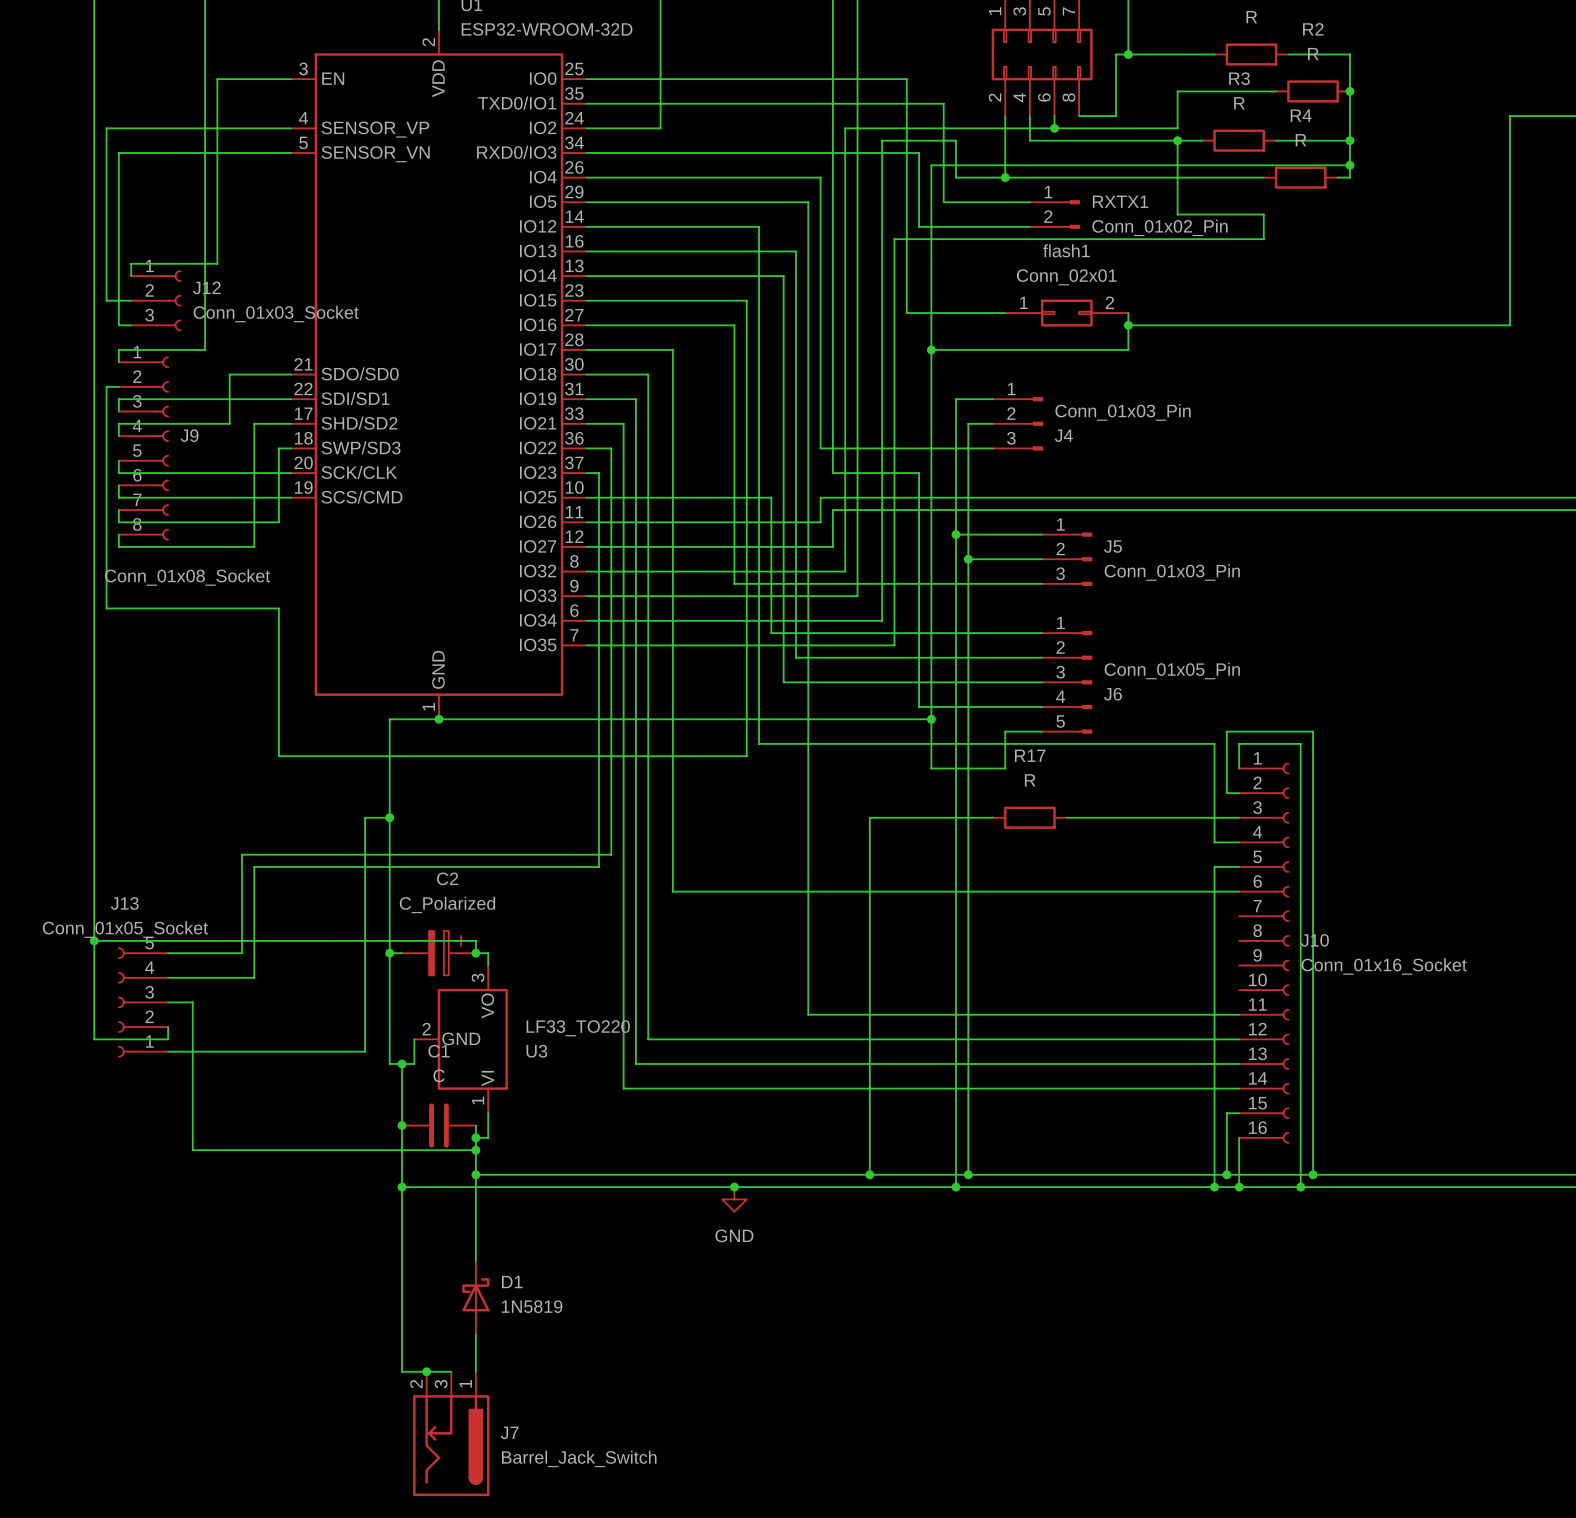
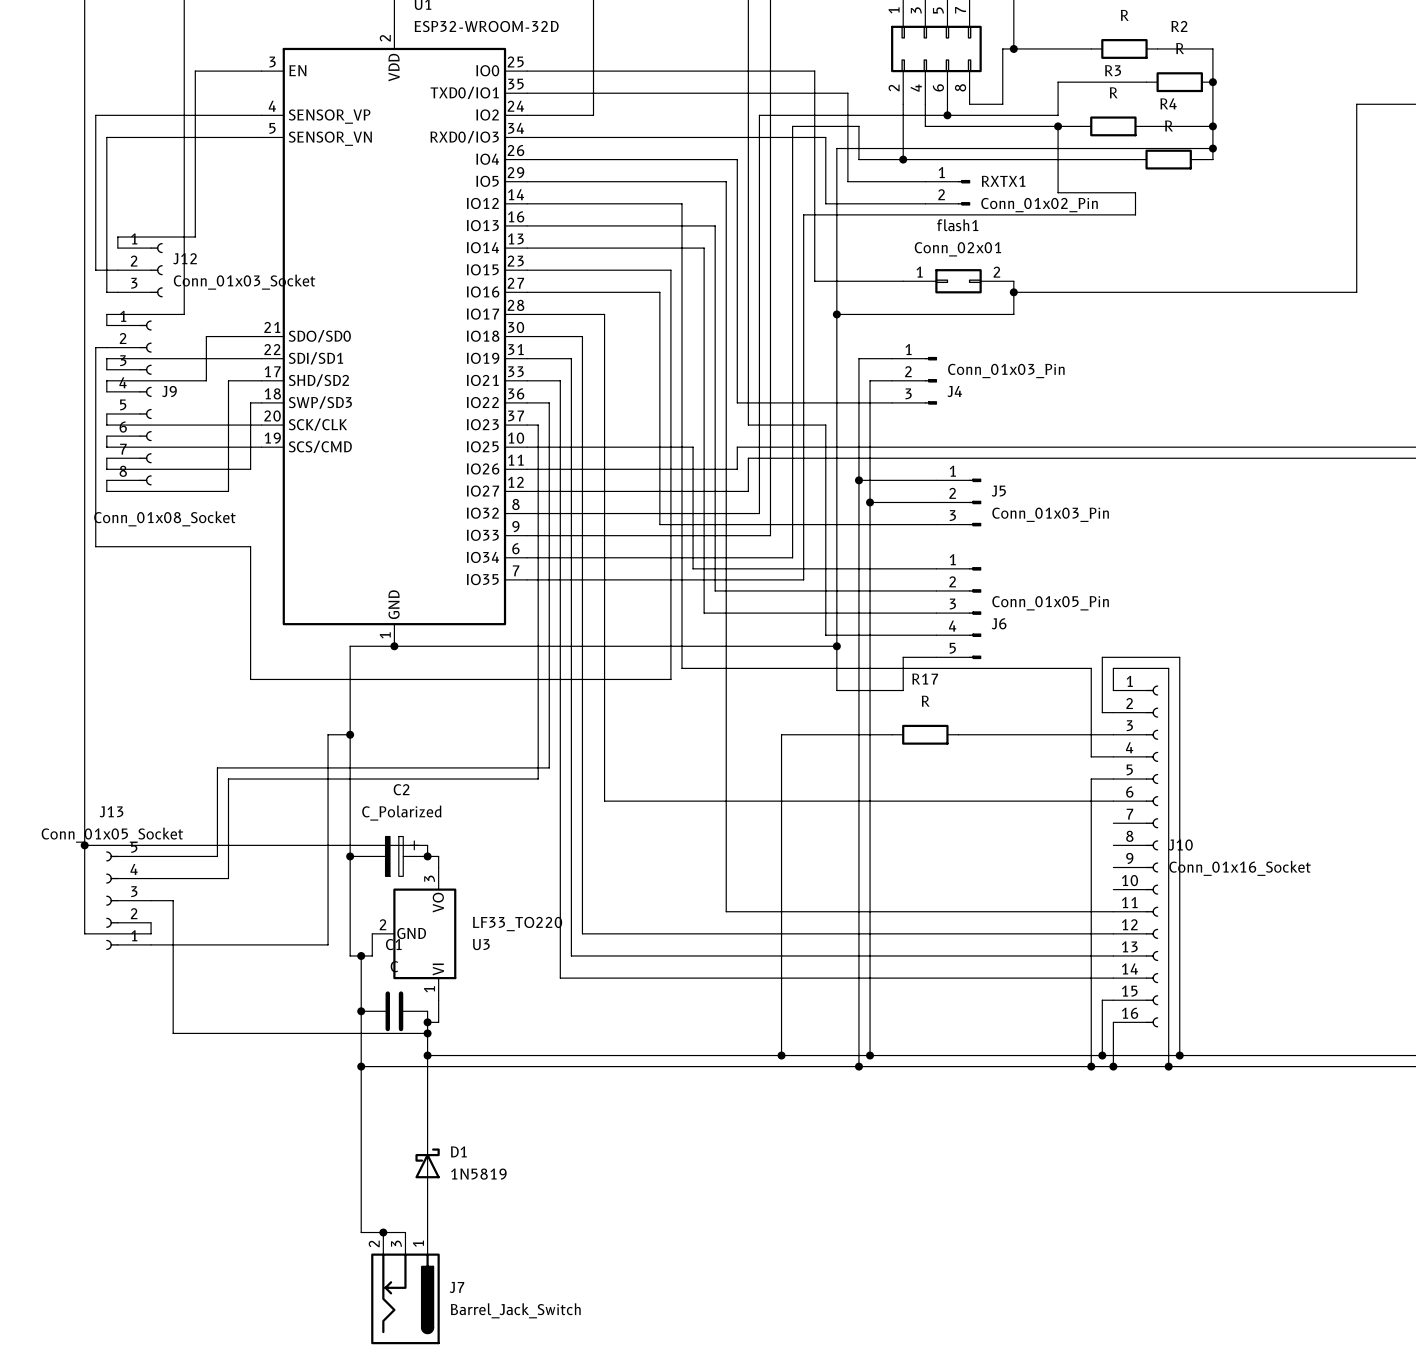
junction: (734, 1187) -> none
power symbol: GND (734, 1199) -> none

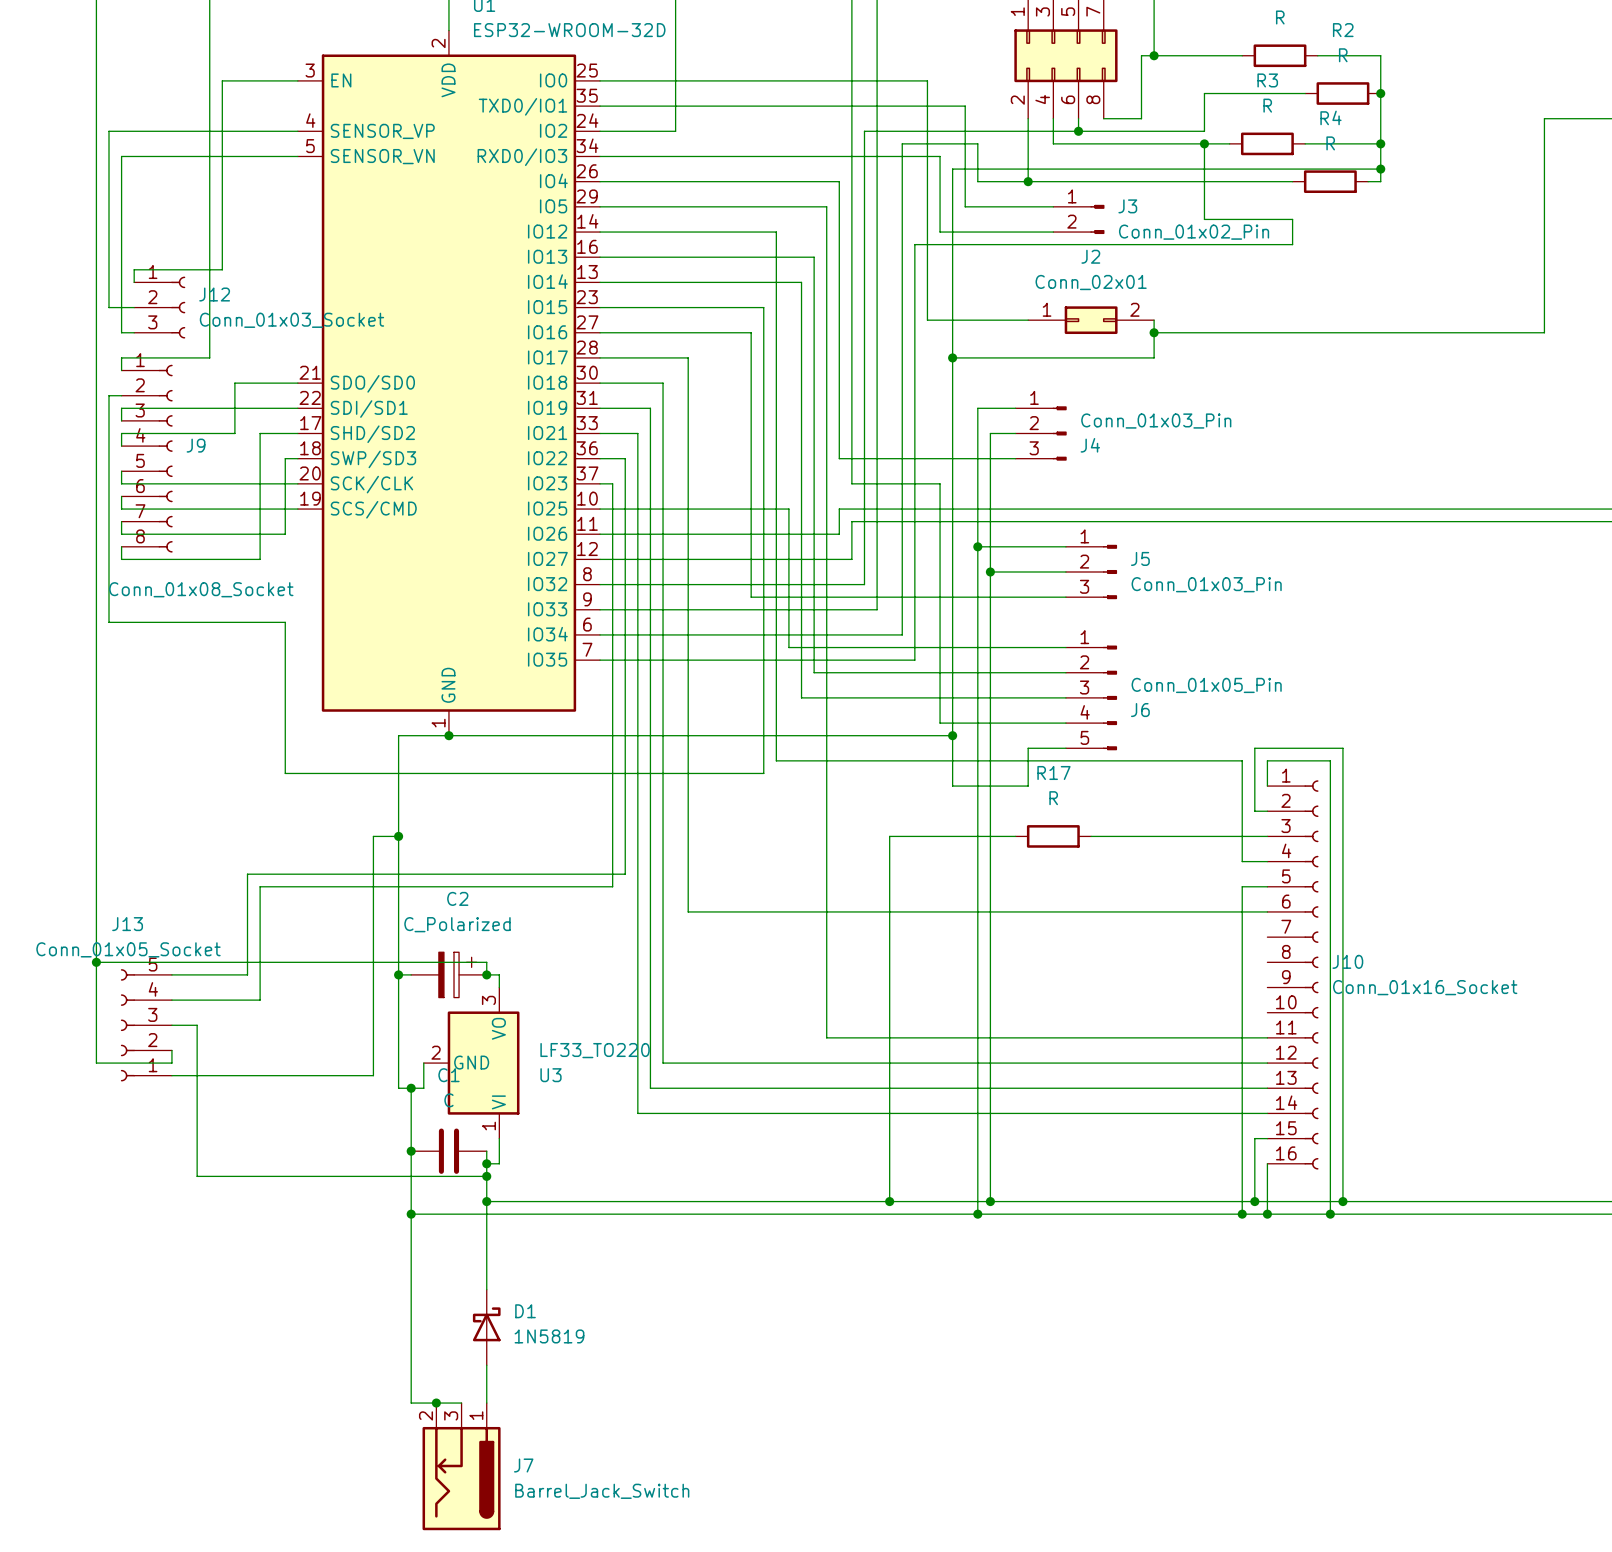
RXTX1 name: RXTX1 (1003, 181) -> J3 (1127, 206)
flash1 name: flash1 (957, 225) -> J2 (1090, 256)

